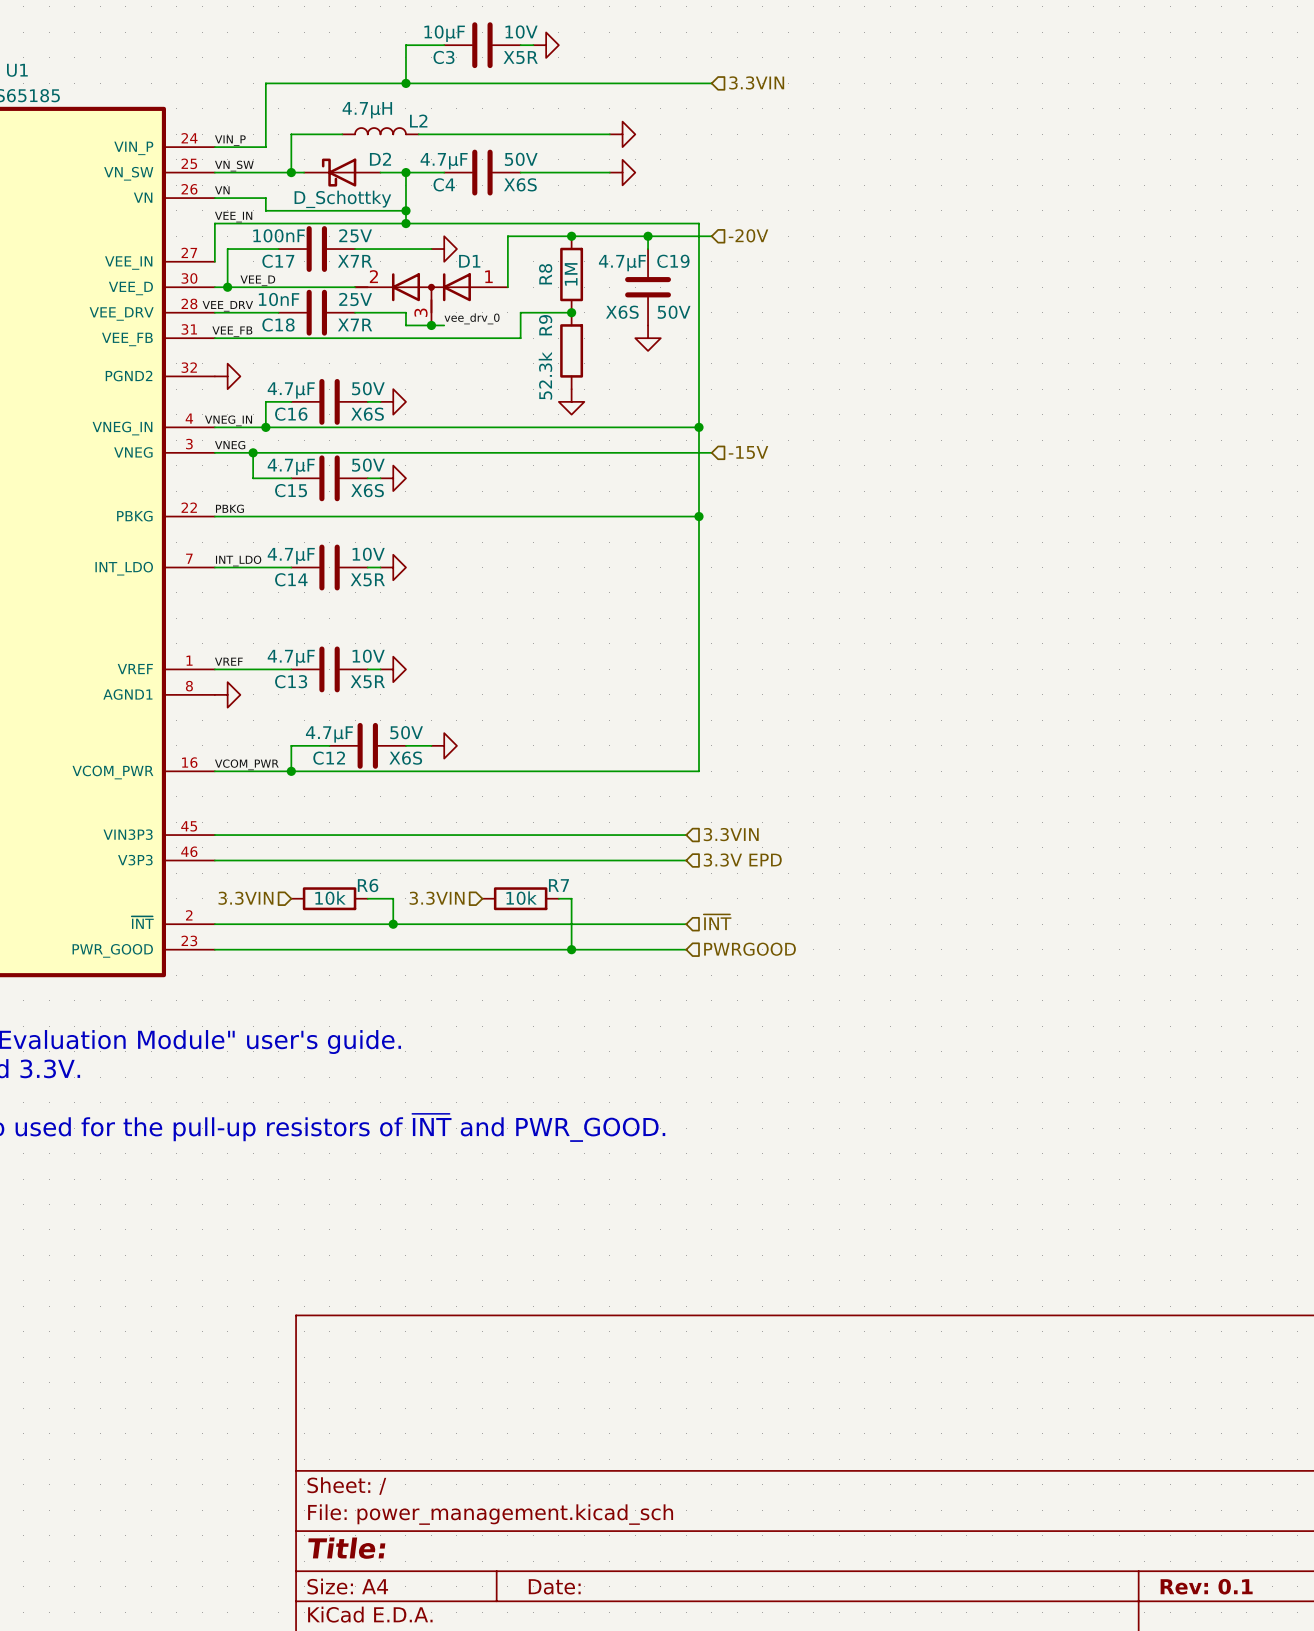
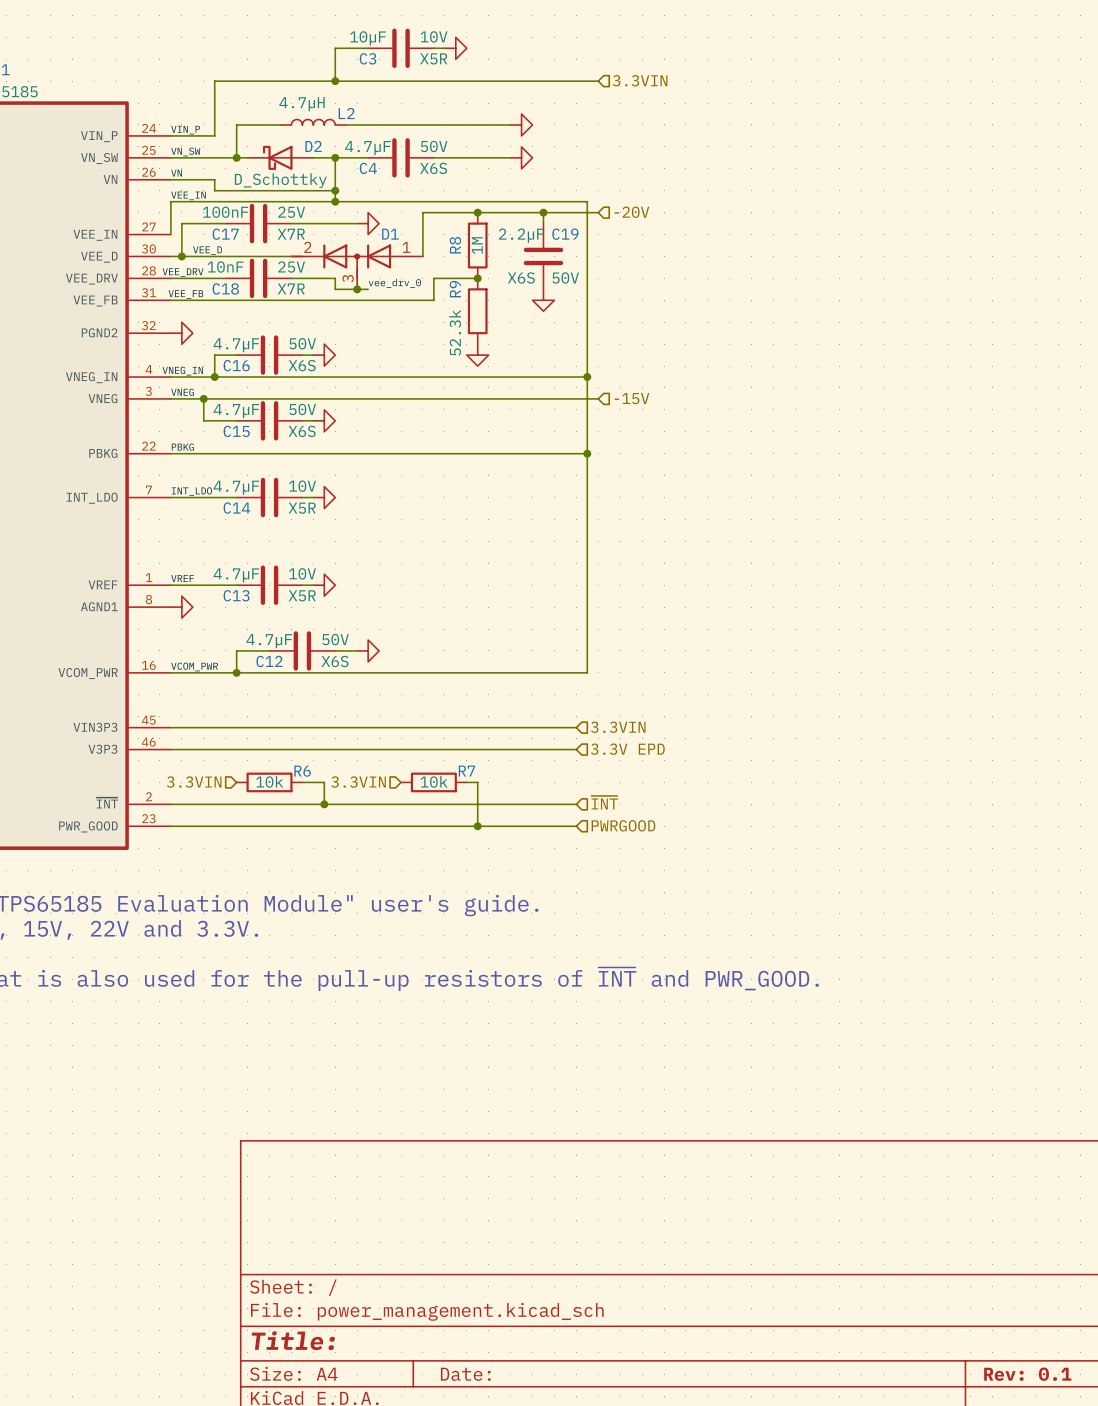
C19 value: 4.7µF (622, 263) -> 2.2µF (521, 235)

